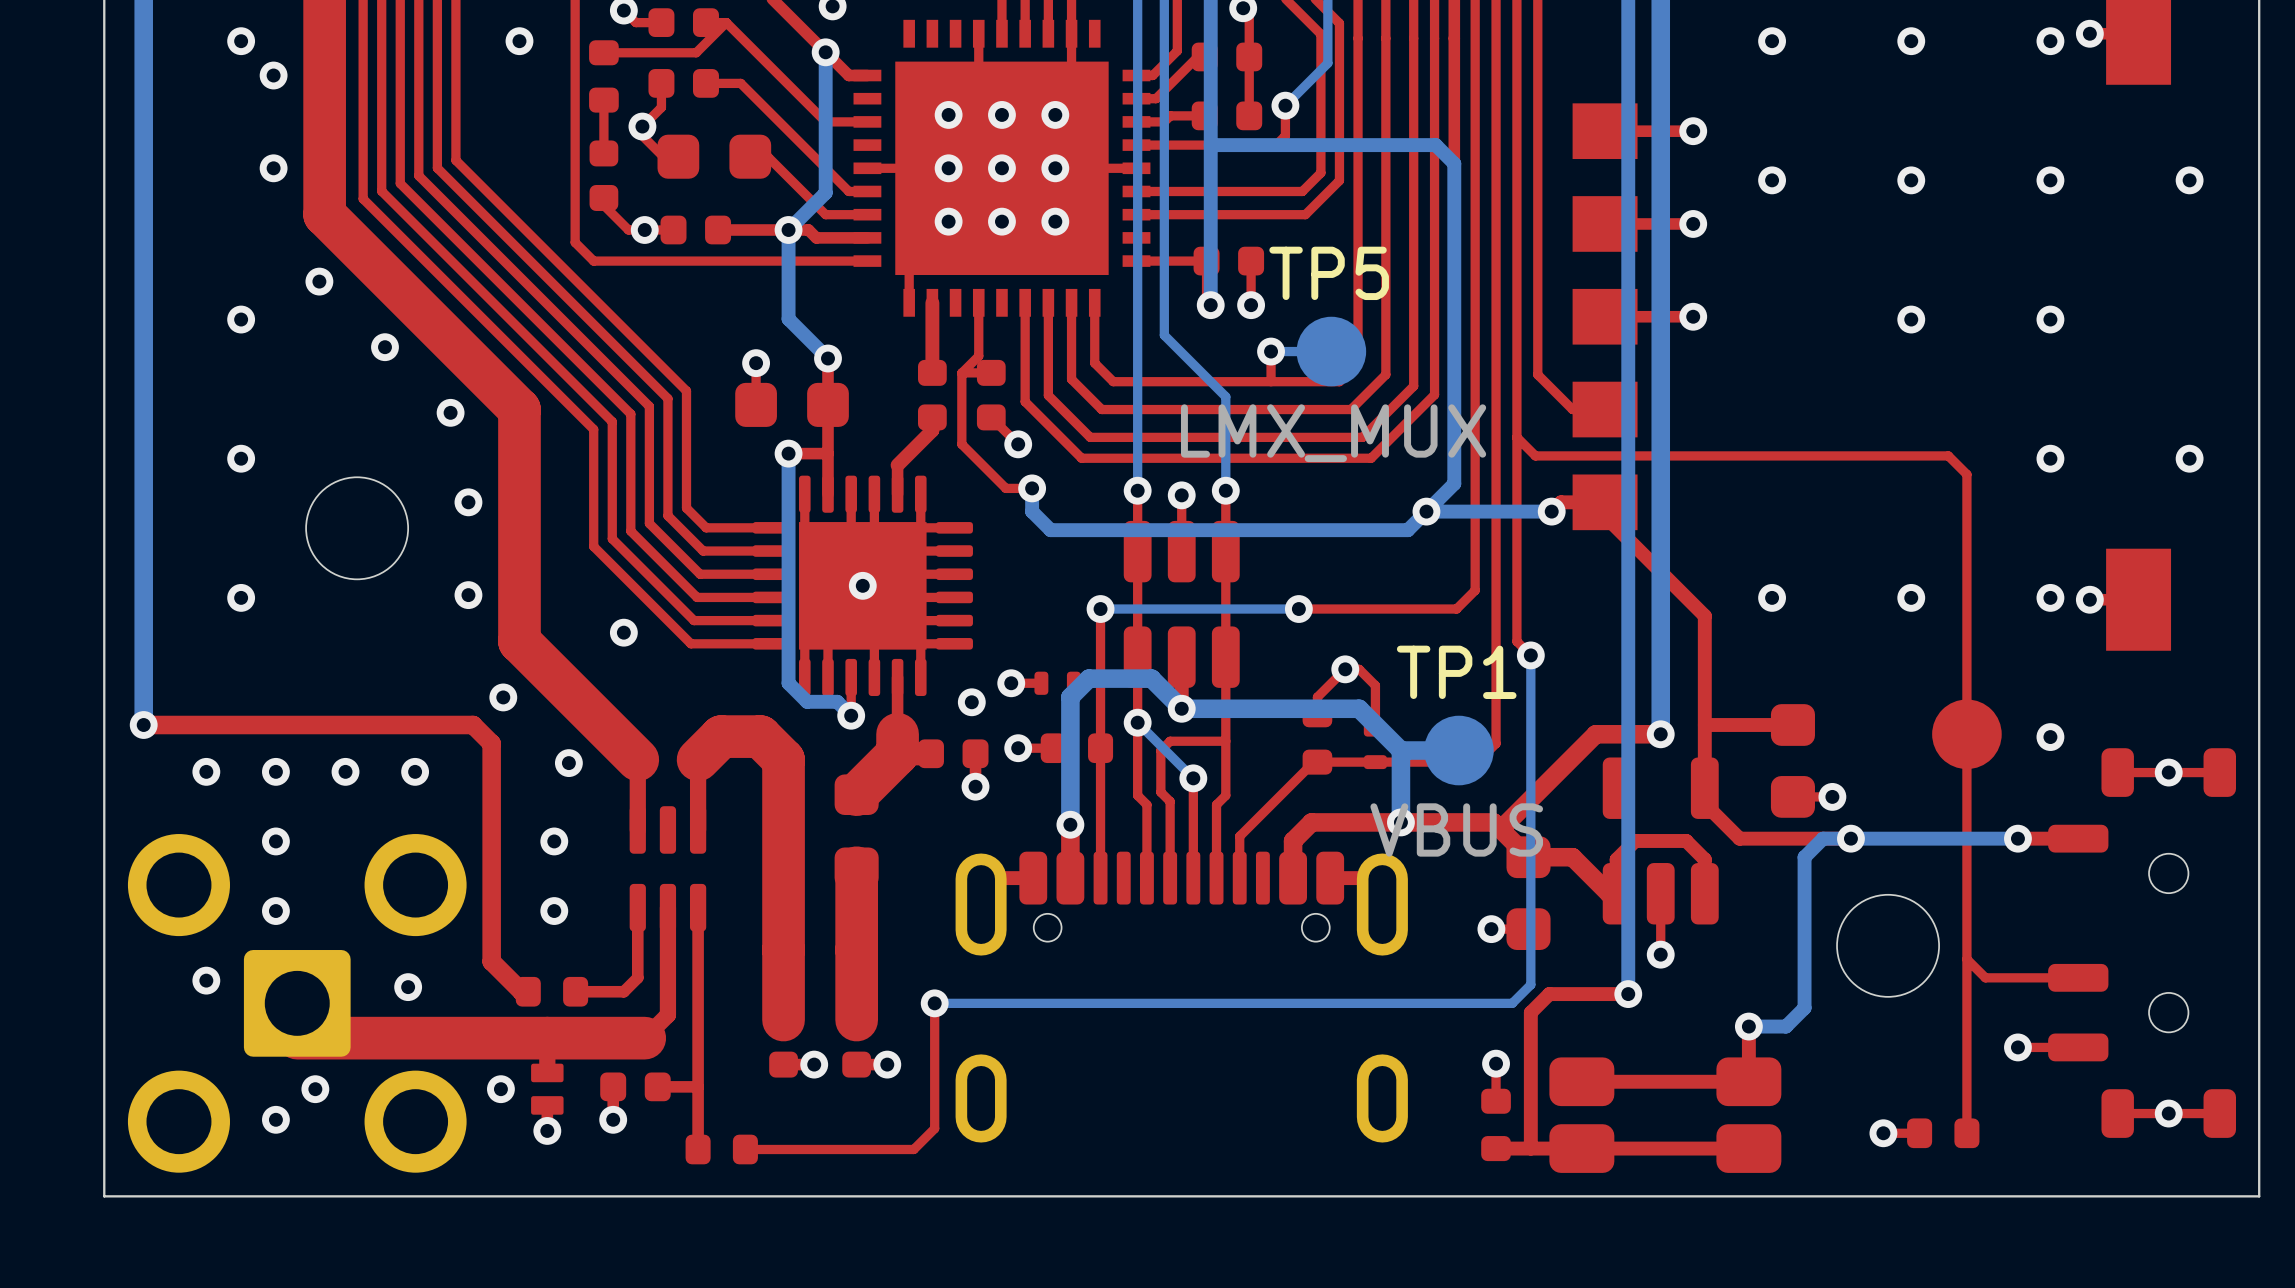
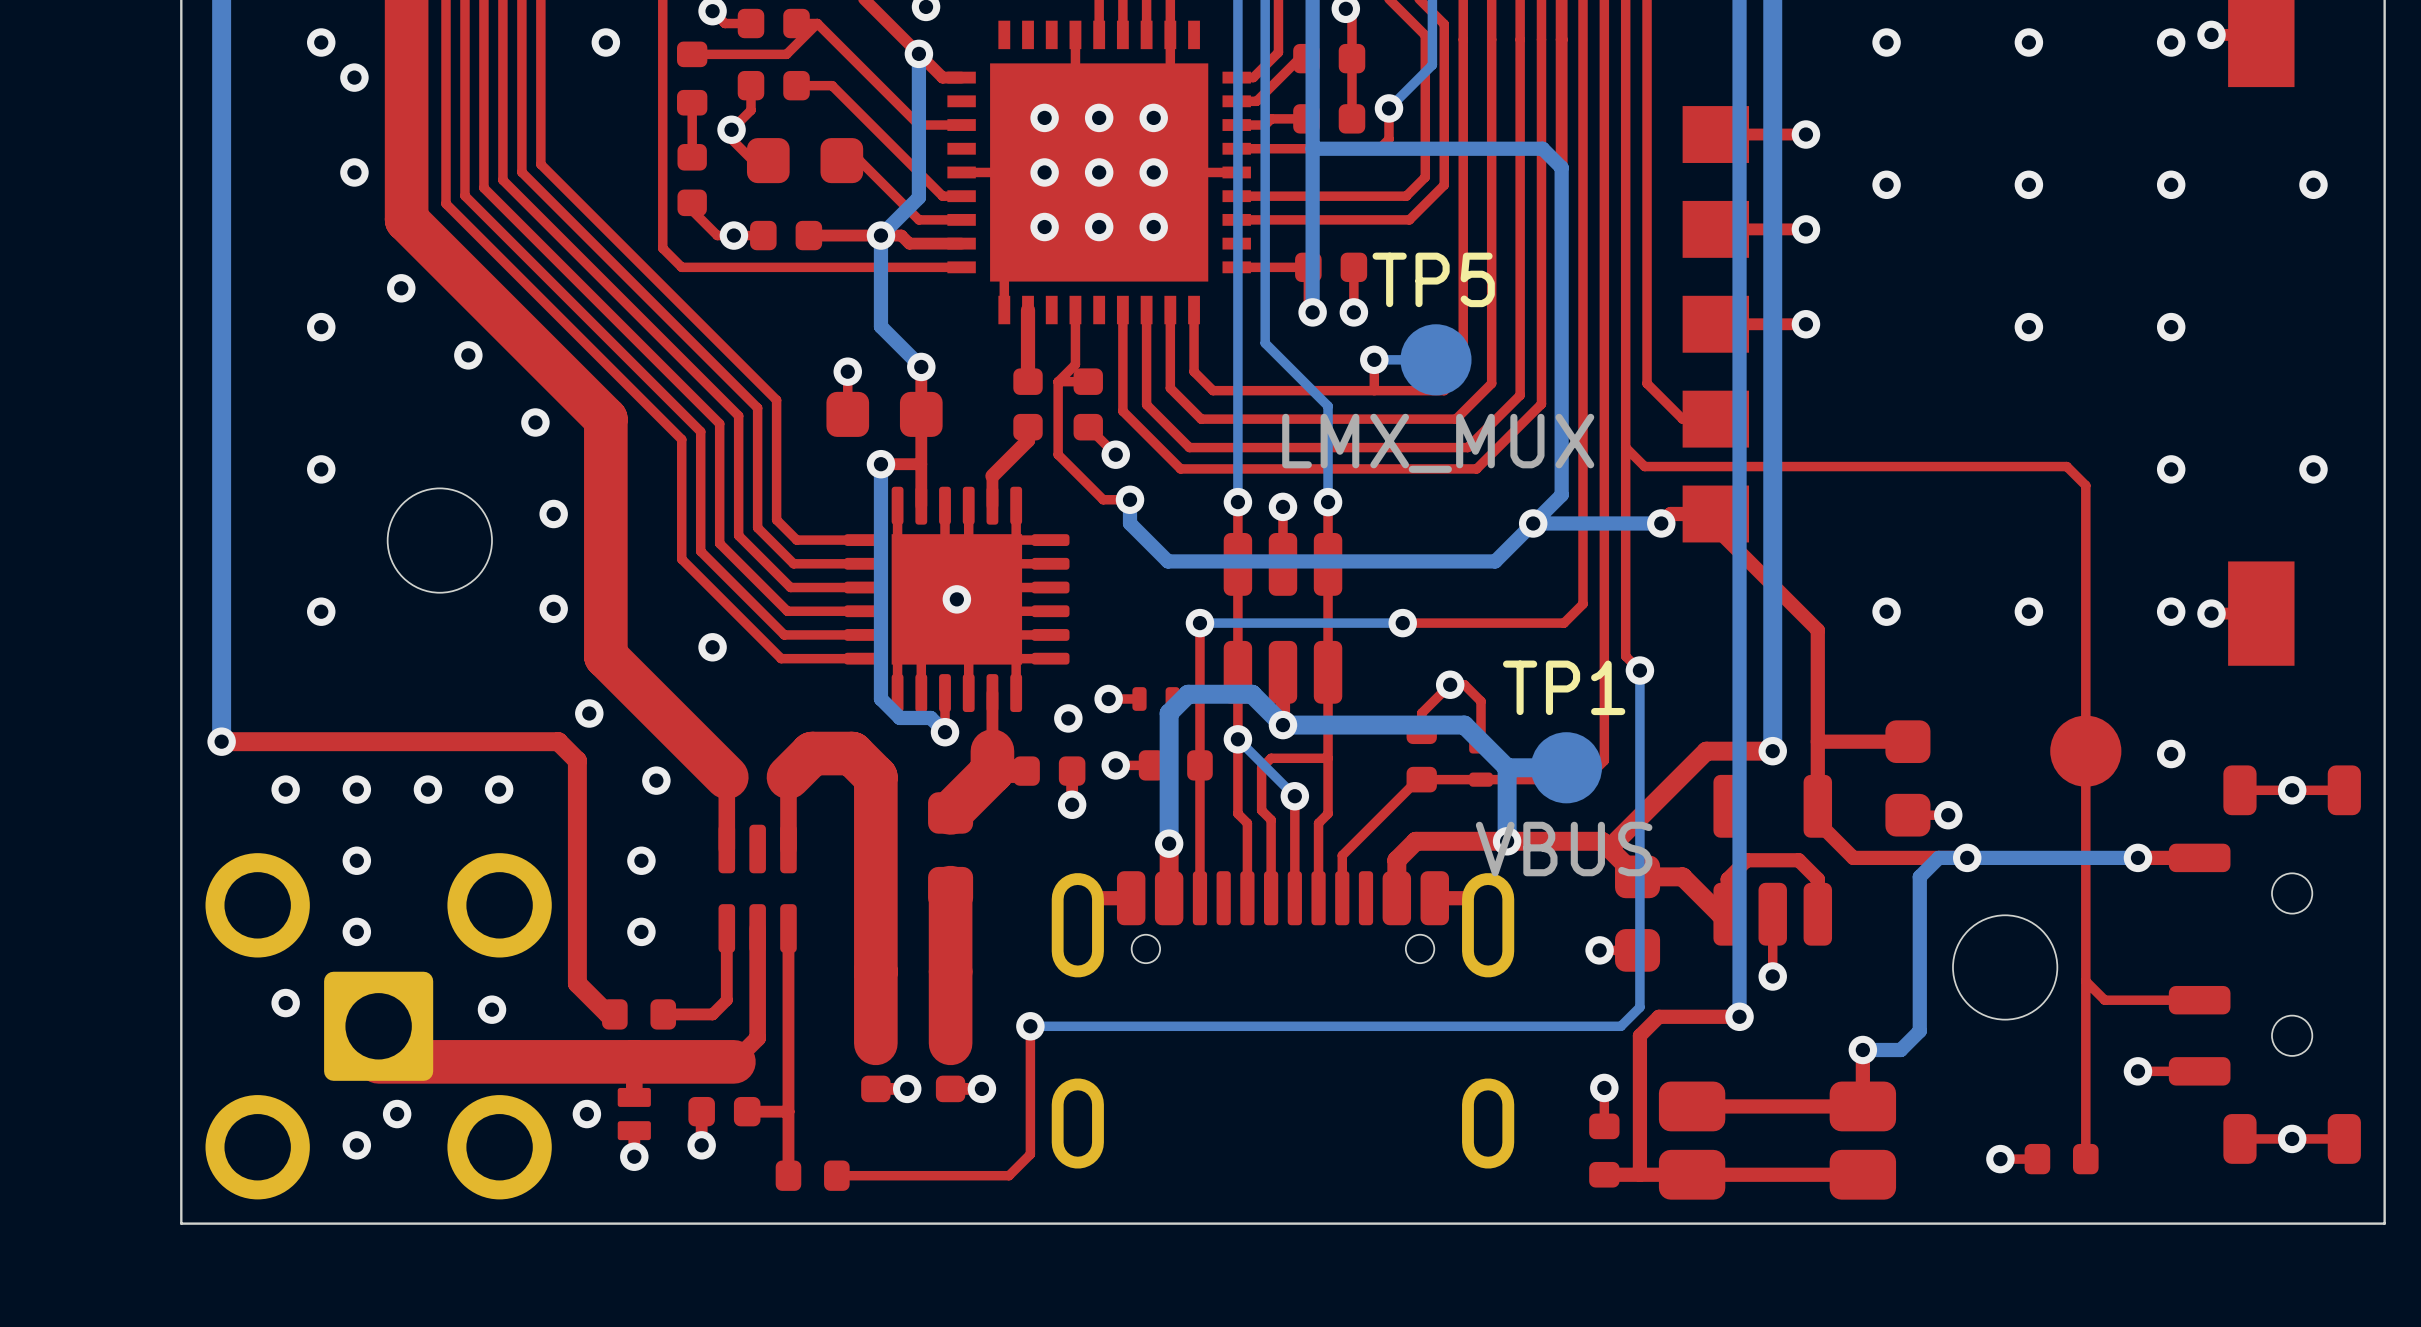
bottom track: (1407, 530) (1050, 530) -> (1514, 542) (1495, 561) (1167, 561) (1148, 542)

